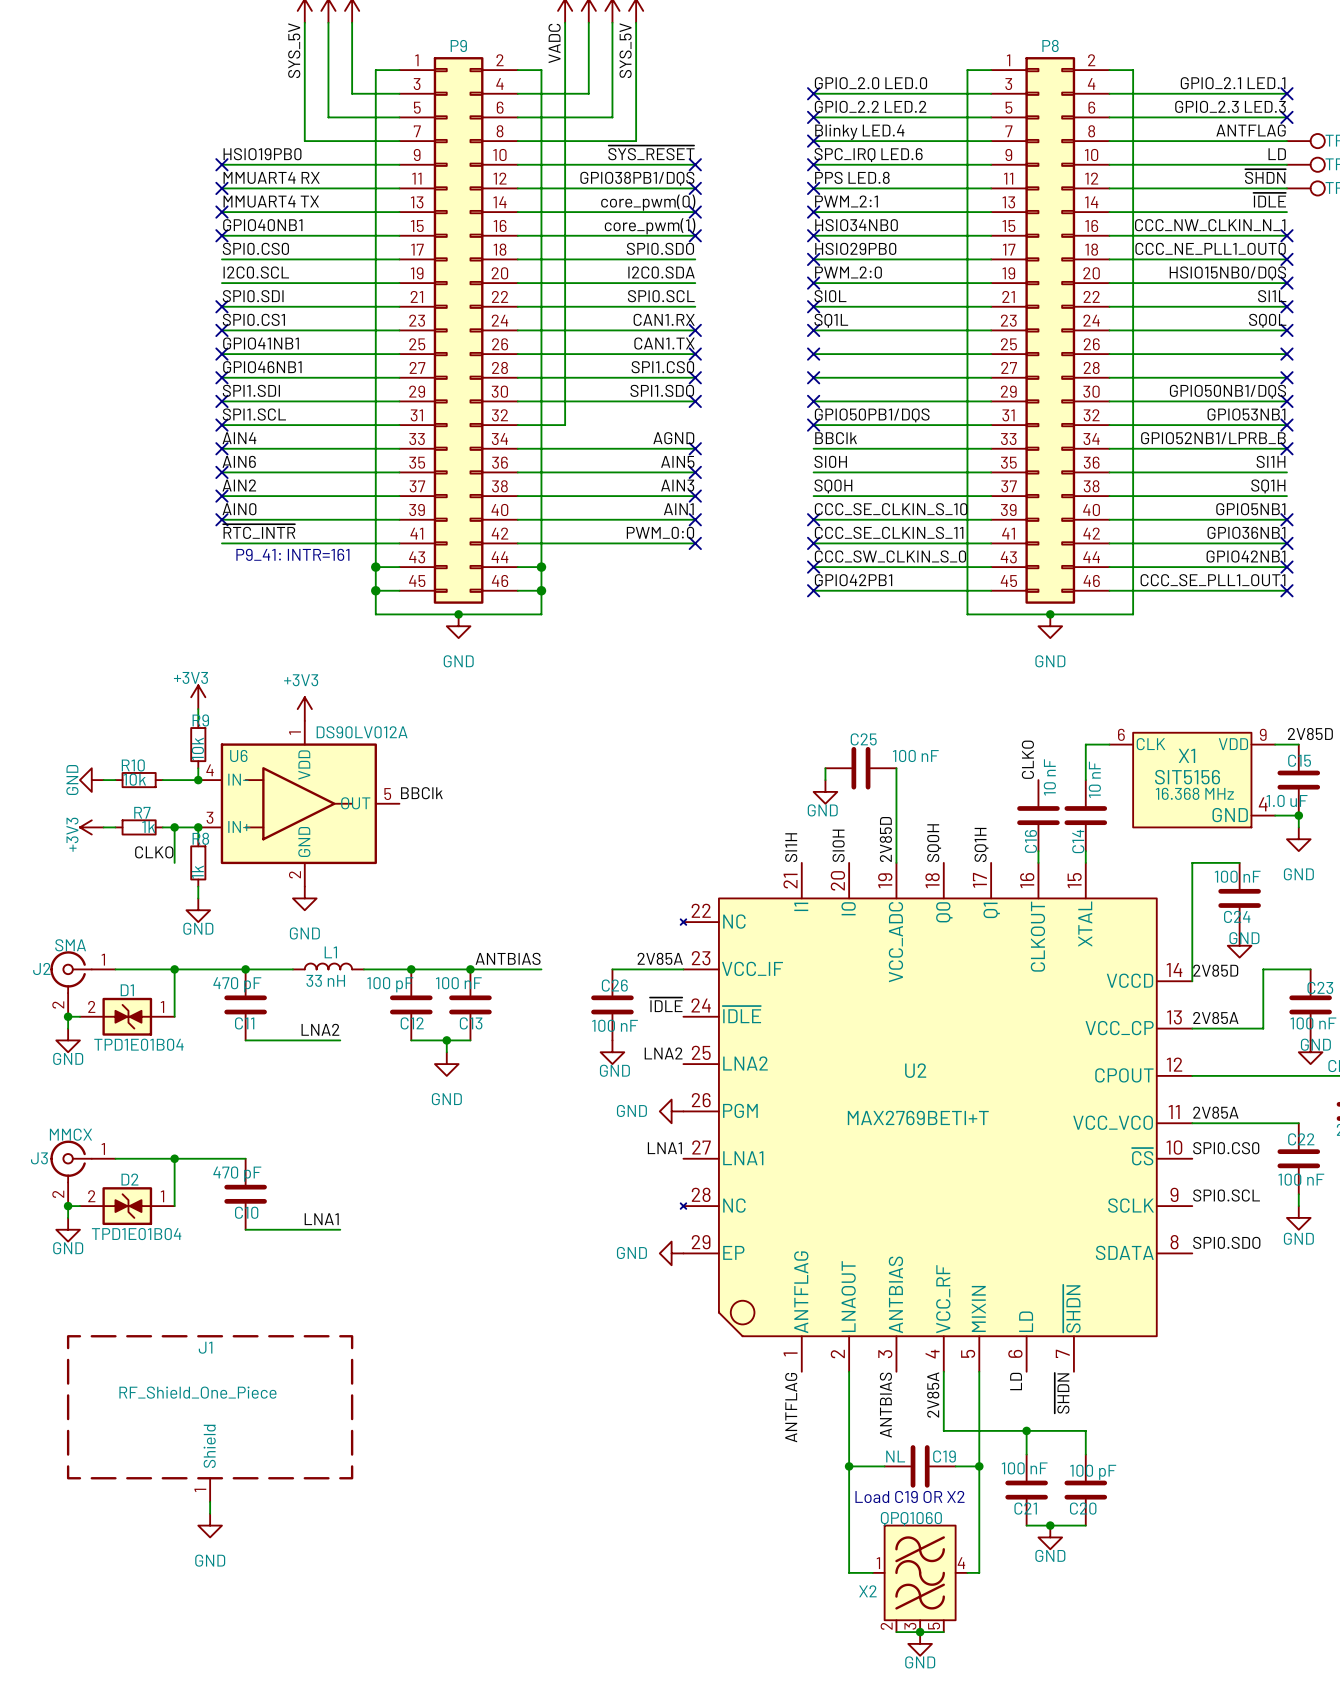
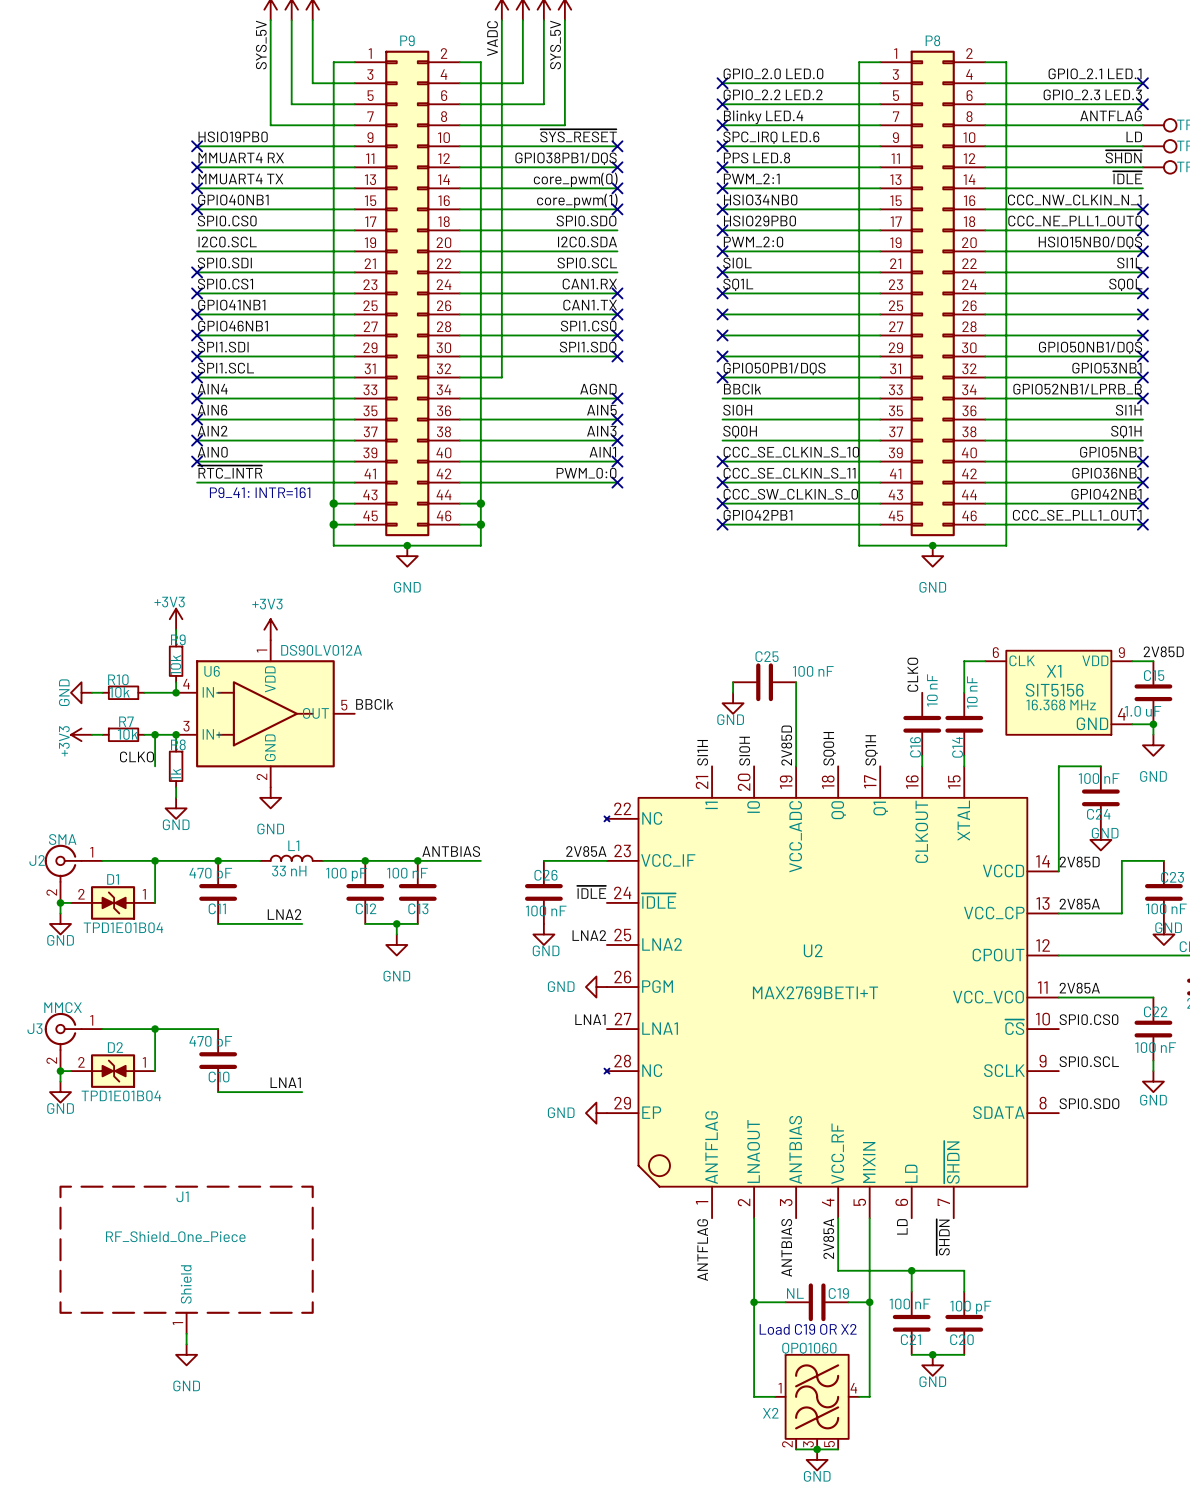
R7 value: 1k (148, 826) -> 10k (127, 734)

